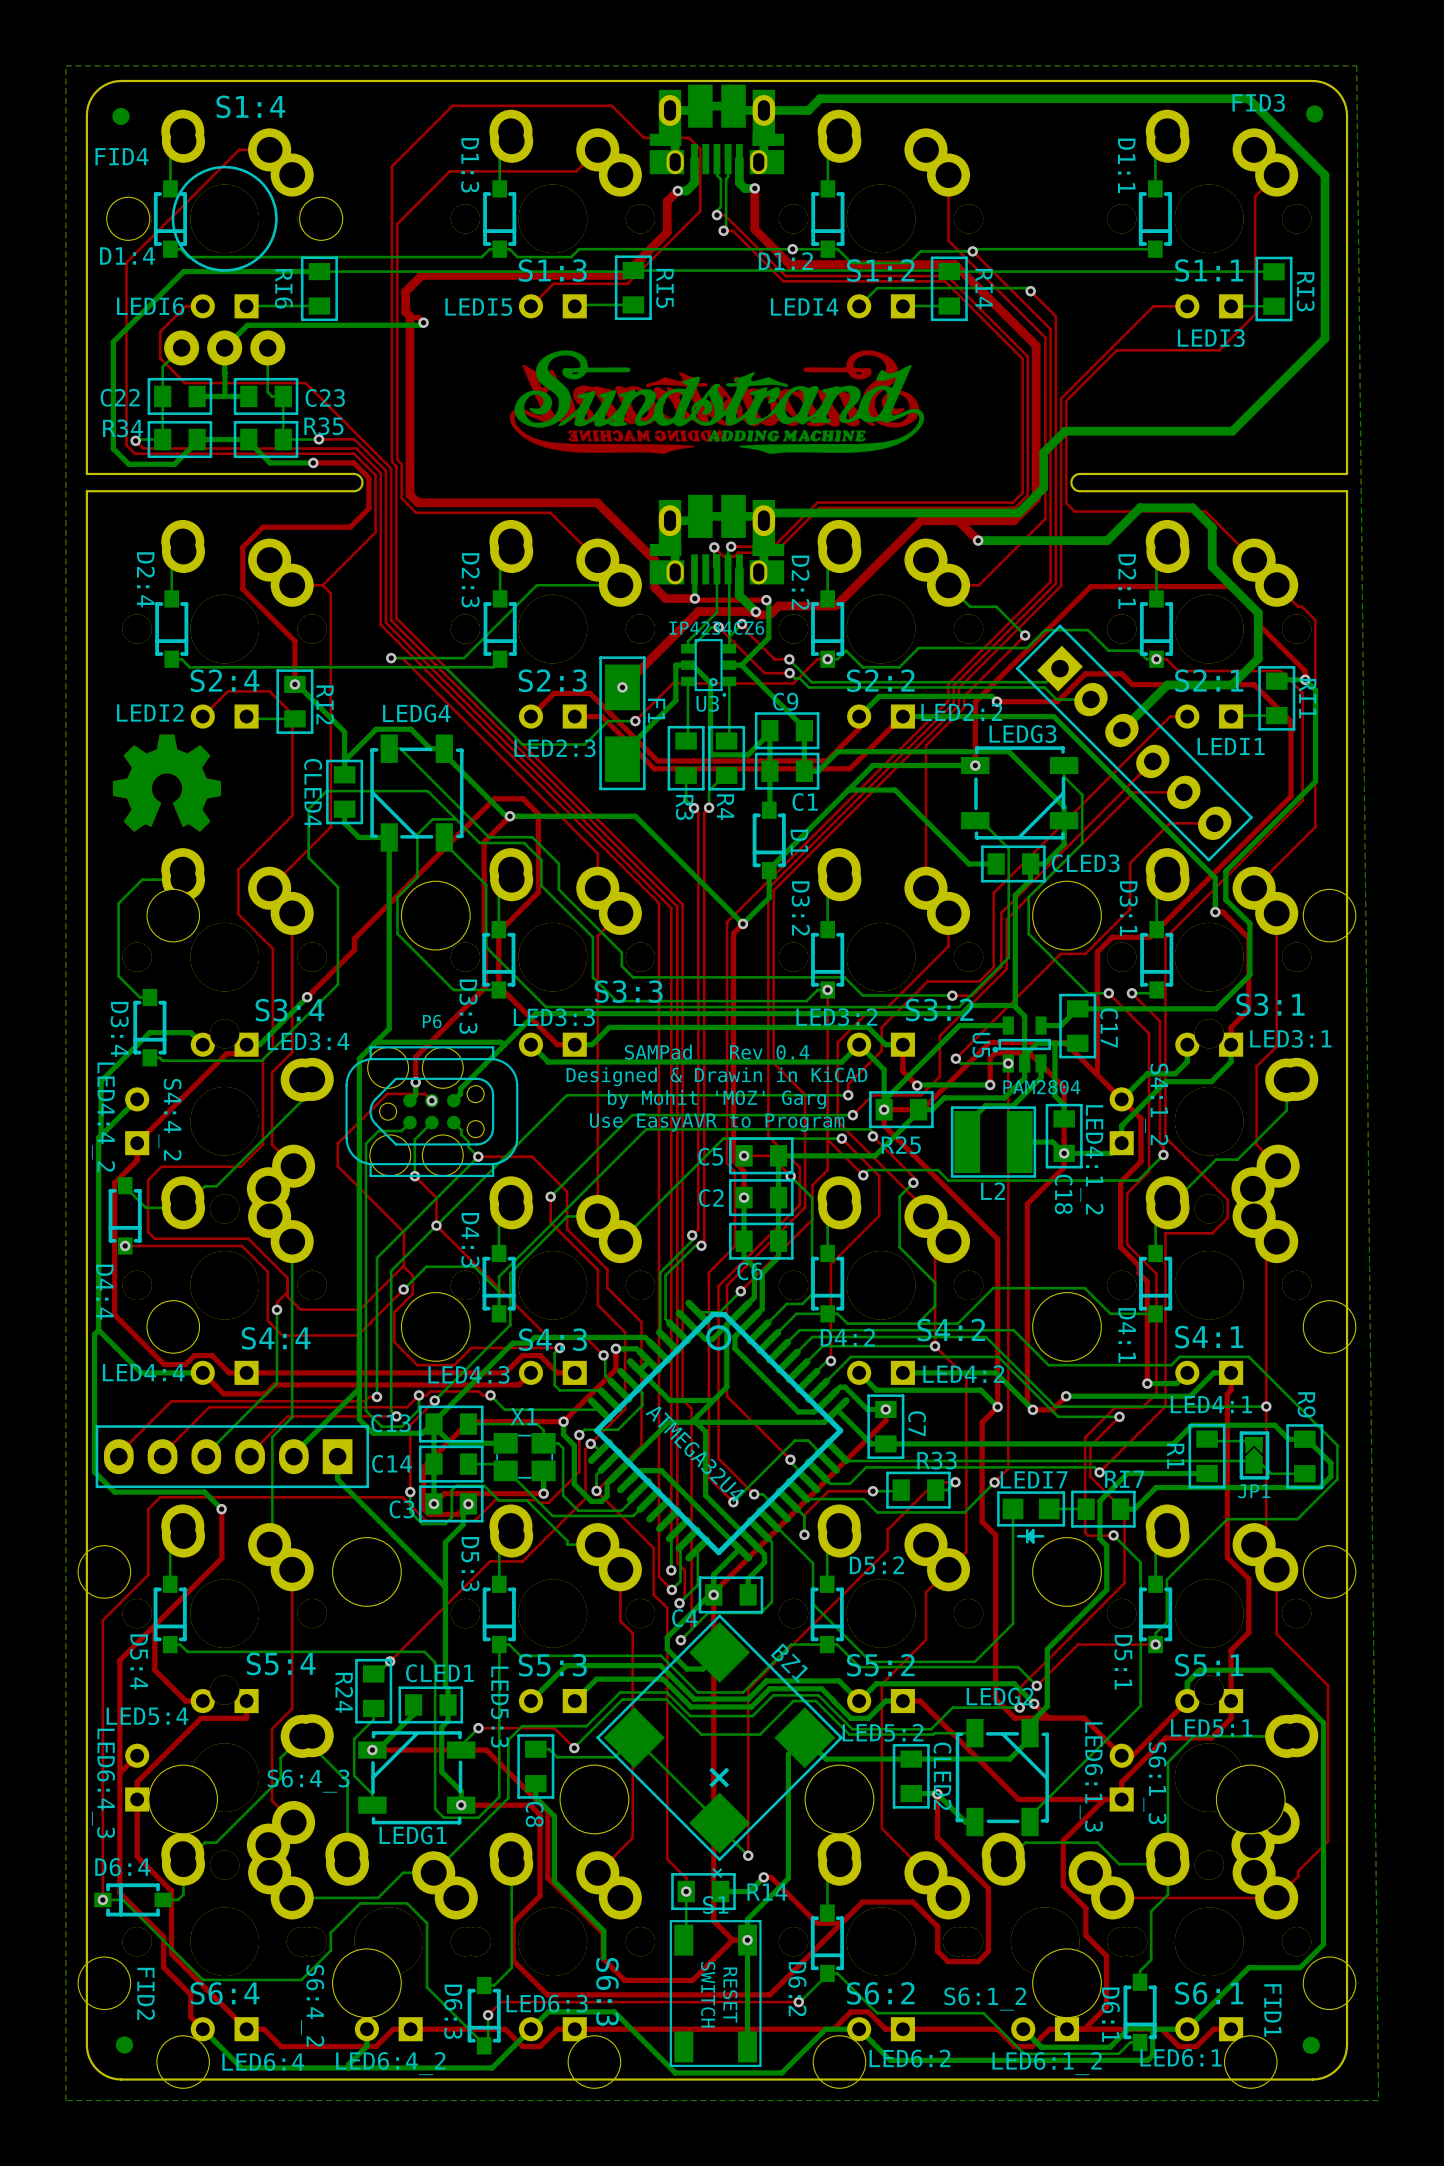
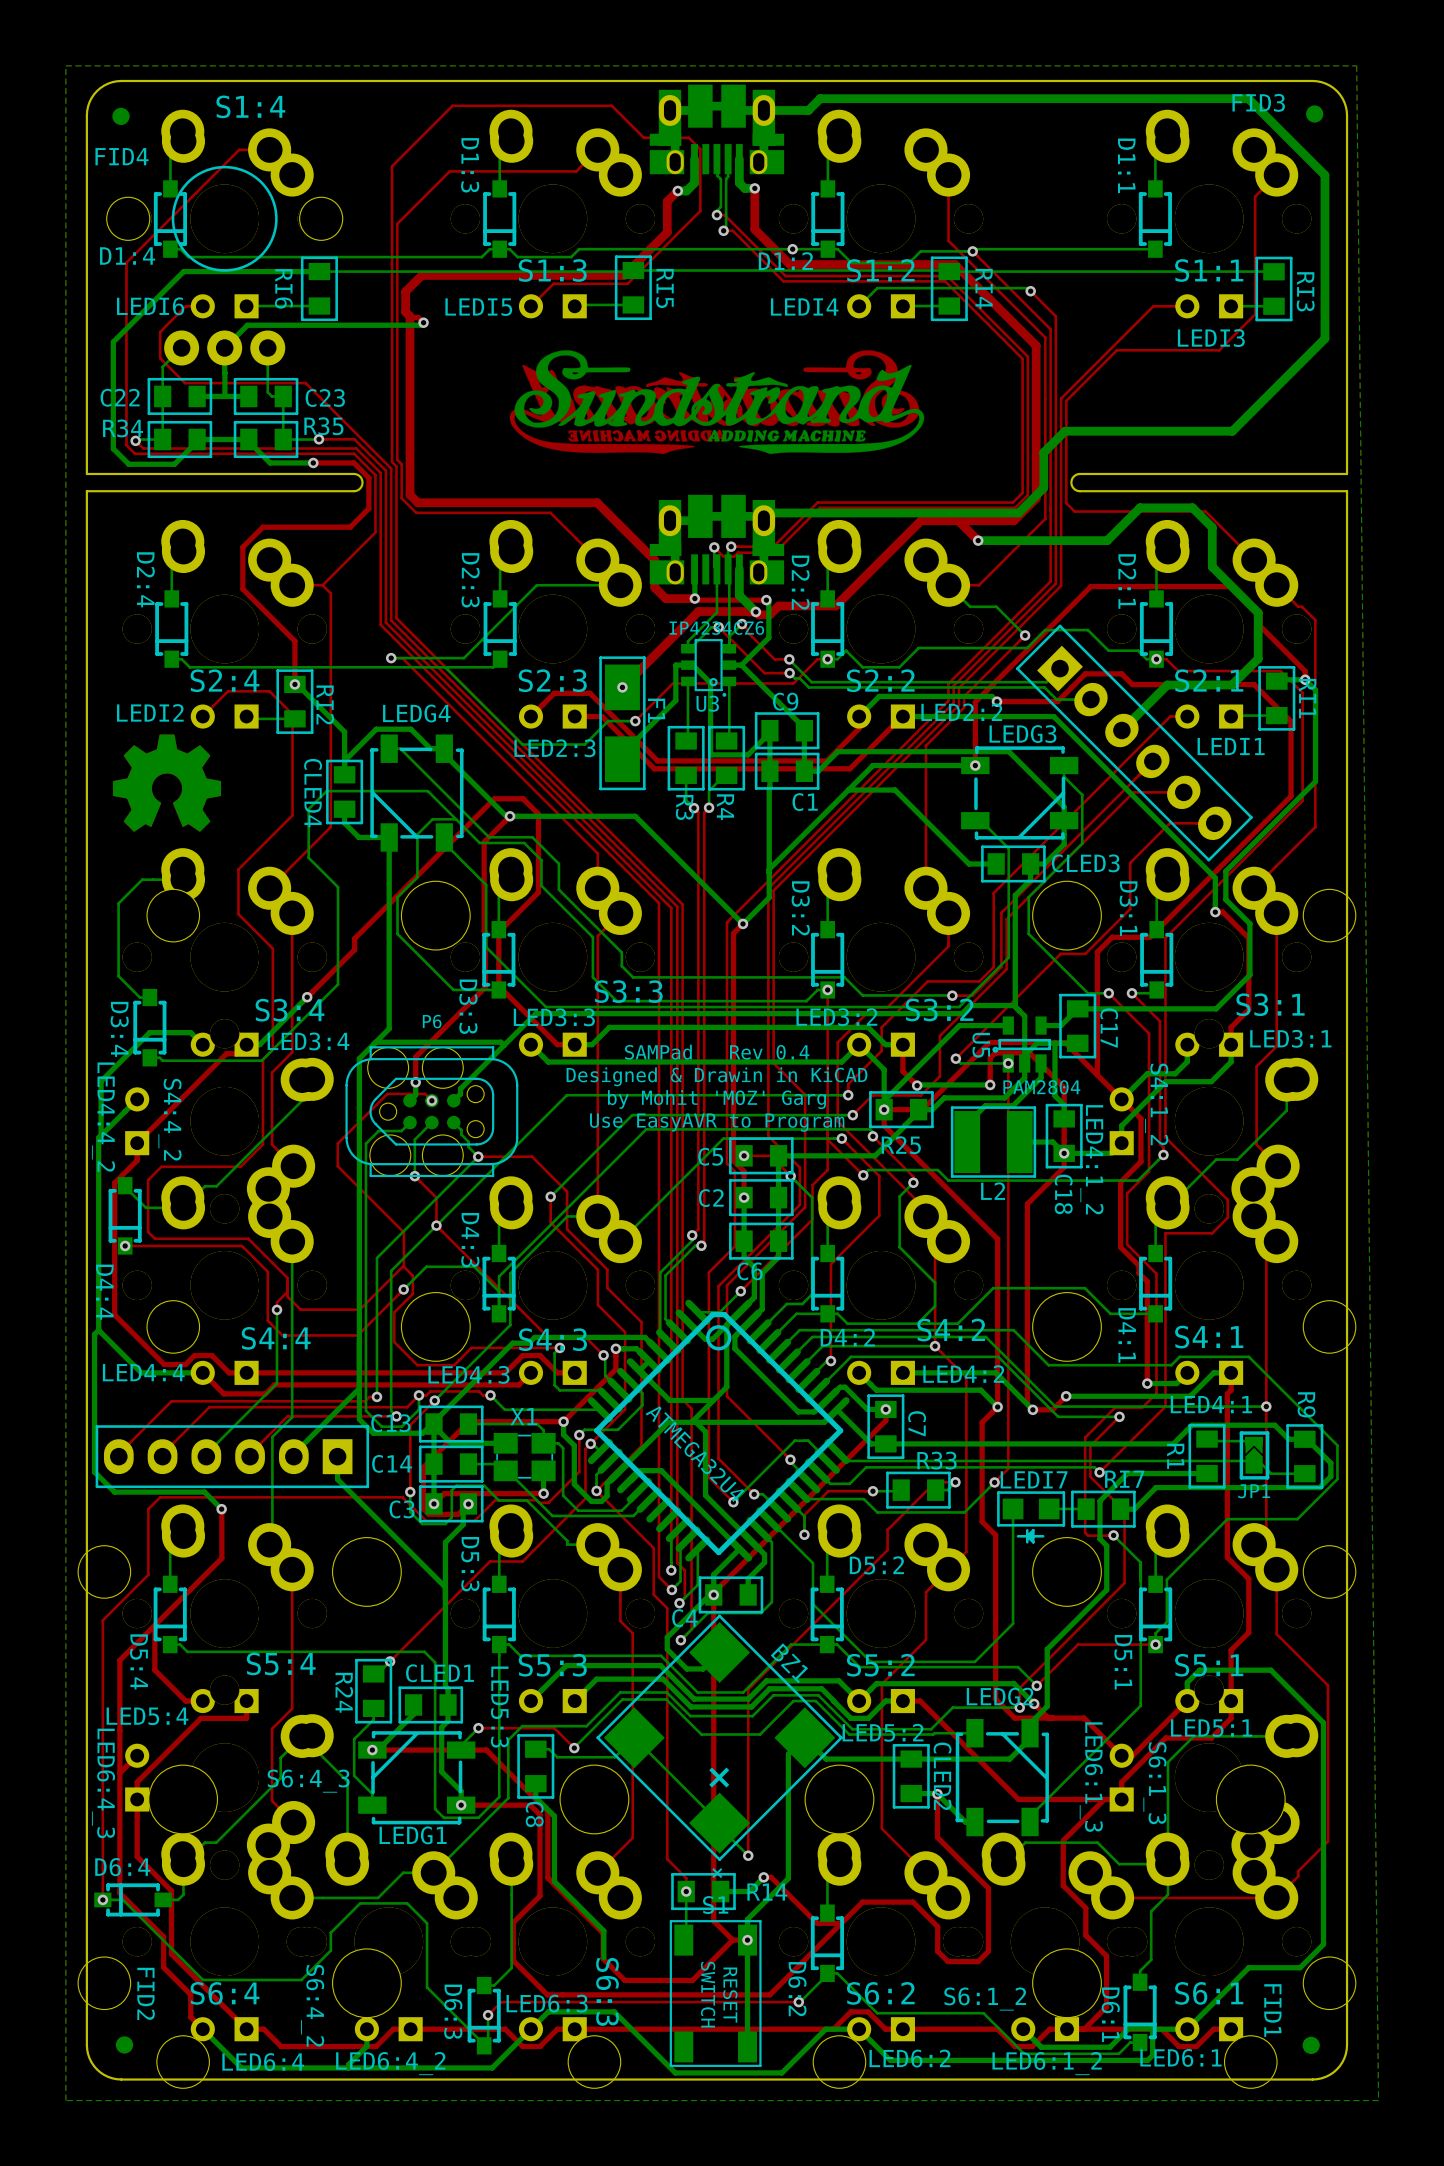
bottom track: (769, 787) (769, 810) -> (769, 787) (769, 869)
D1: (769, 840) -> none

